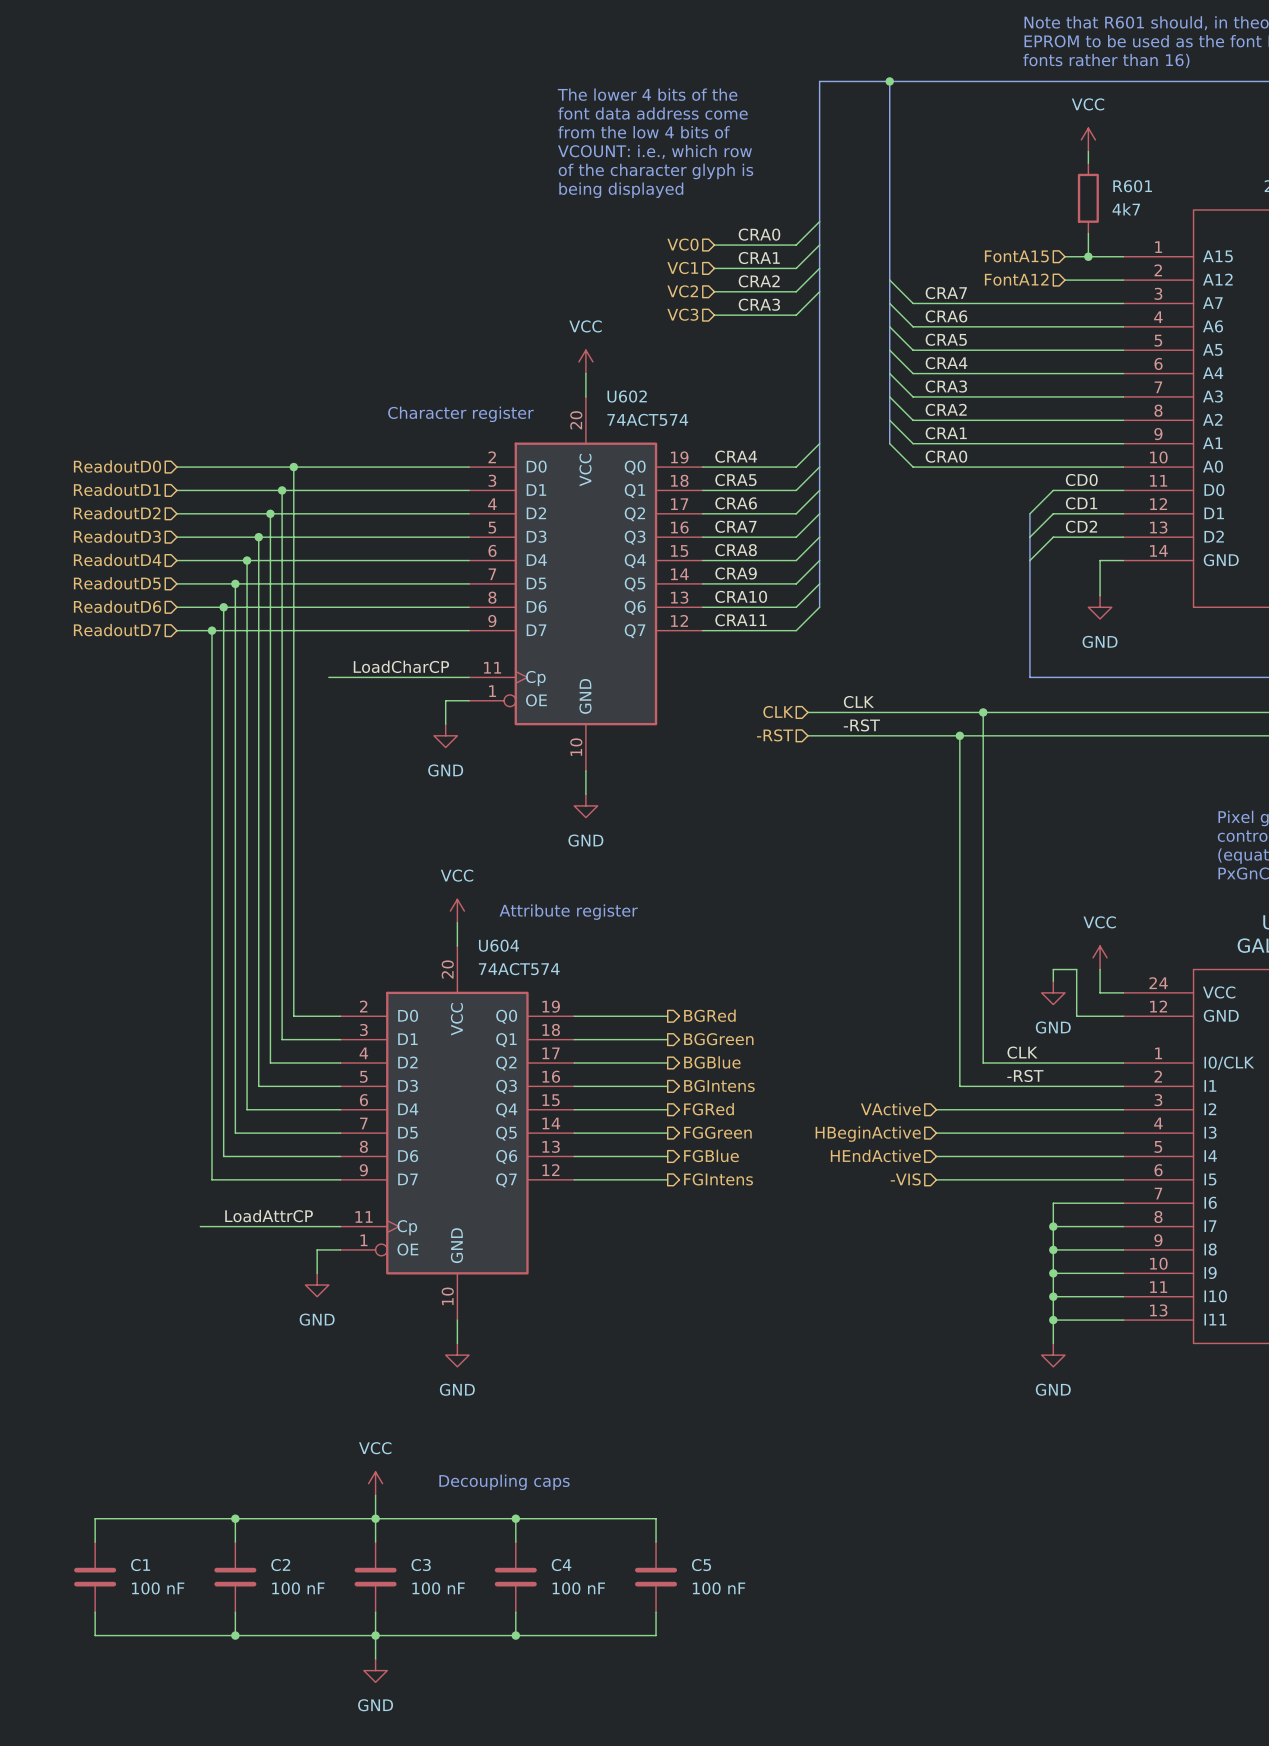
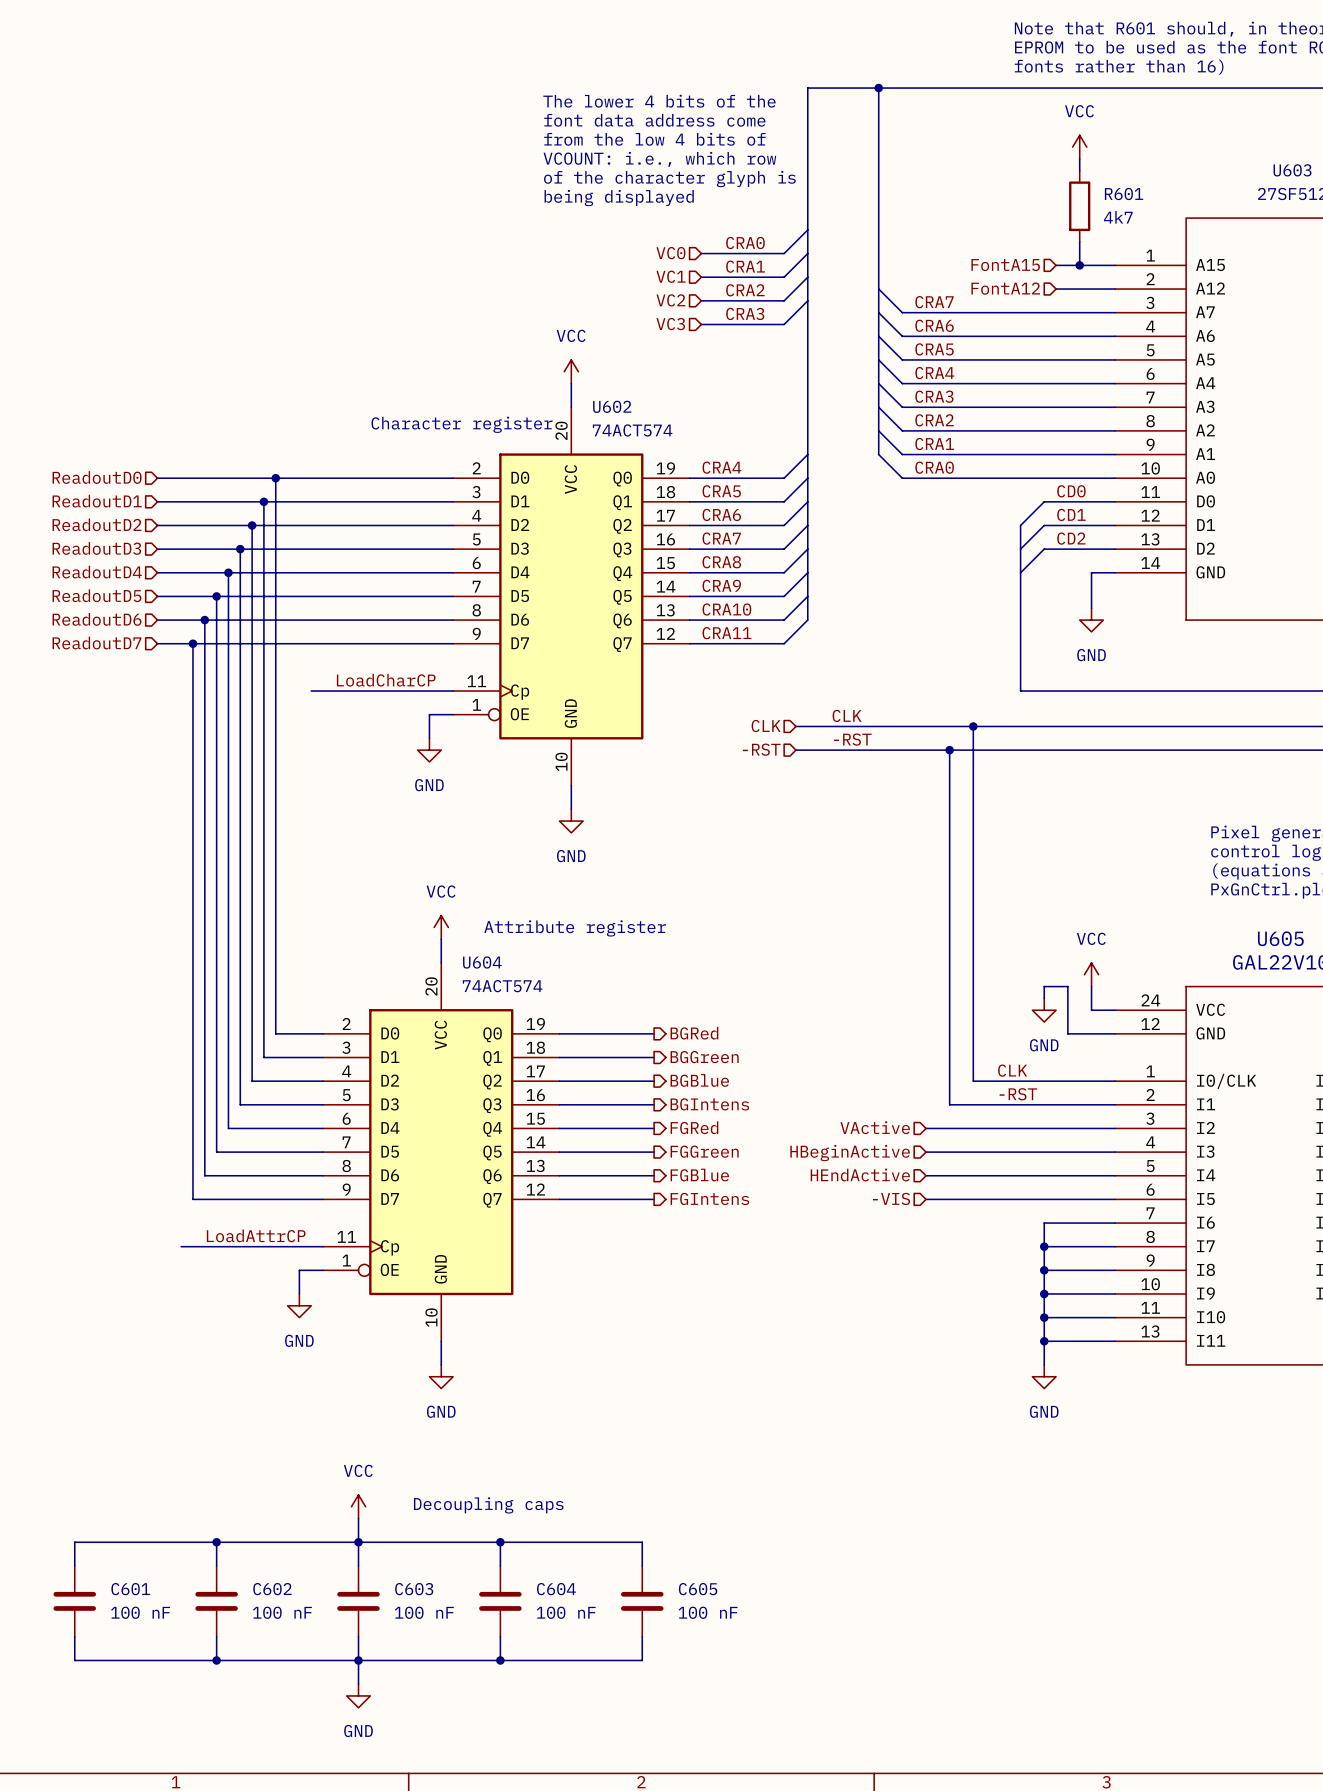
C1 name: C1 (140, 1565) -> C601 (130, 1589)
C2 name: C2 (280, 1565) -> C602 (272, 1589)
C3 name: C3 (421, 1565) -> C603 (414, 1589)
C4 name: C4 (561, 1565) -> C604 (556, 1589)
C5 name: C5 (701, 1565) -> C605 (698, 1589)

